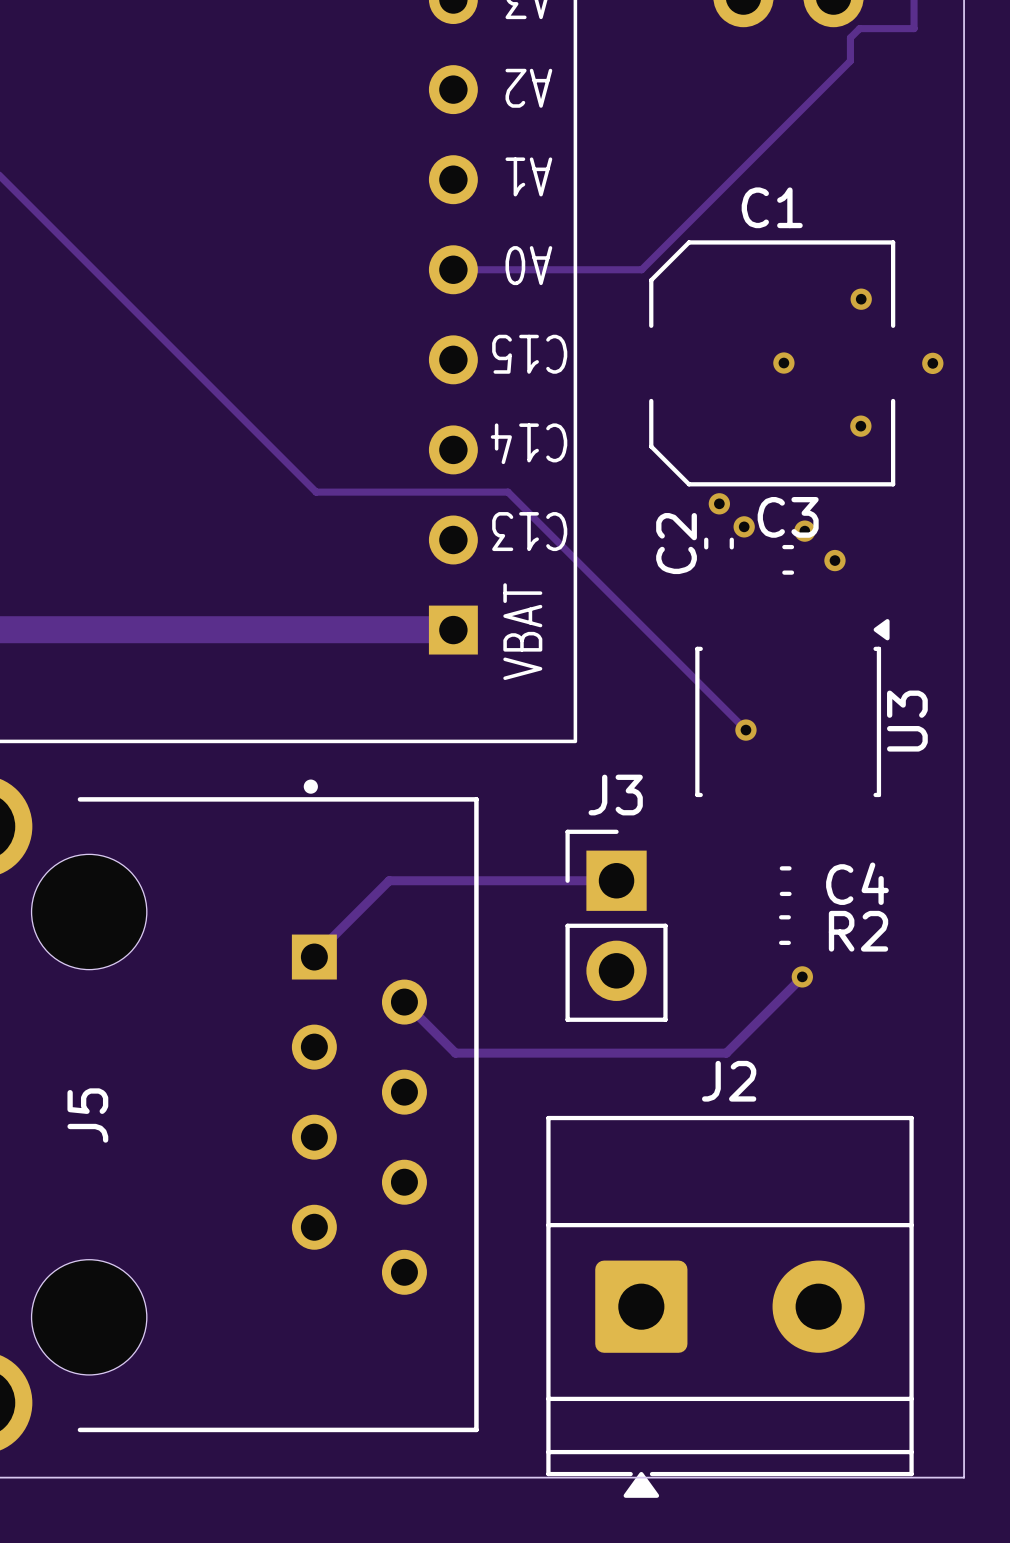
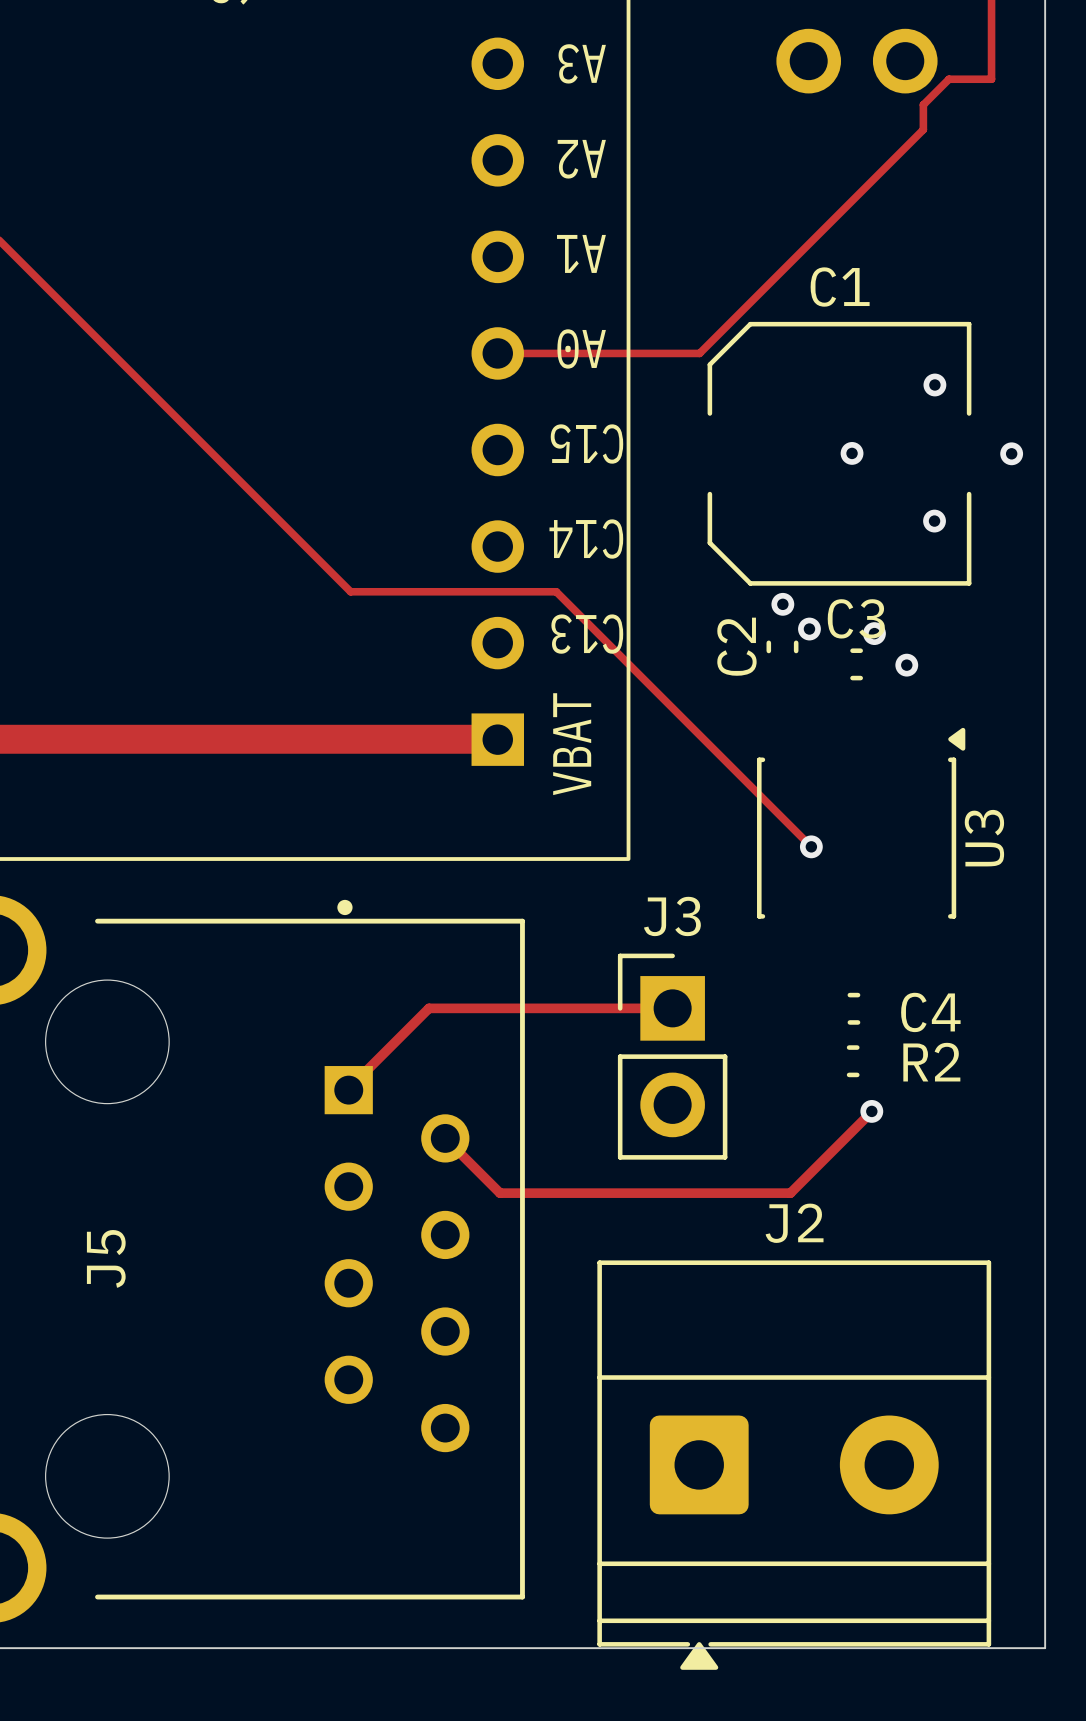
track: (914, 13) (914, 28) (859, 28) -> (991, 79) (948, 79) (933, 94)

